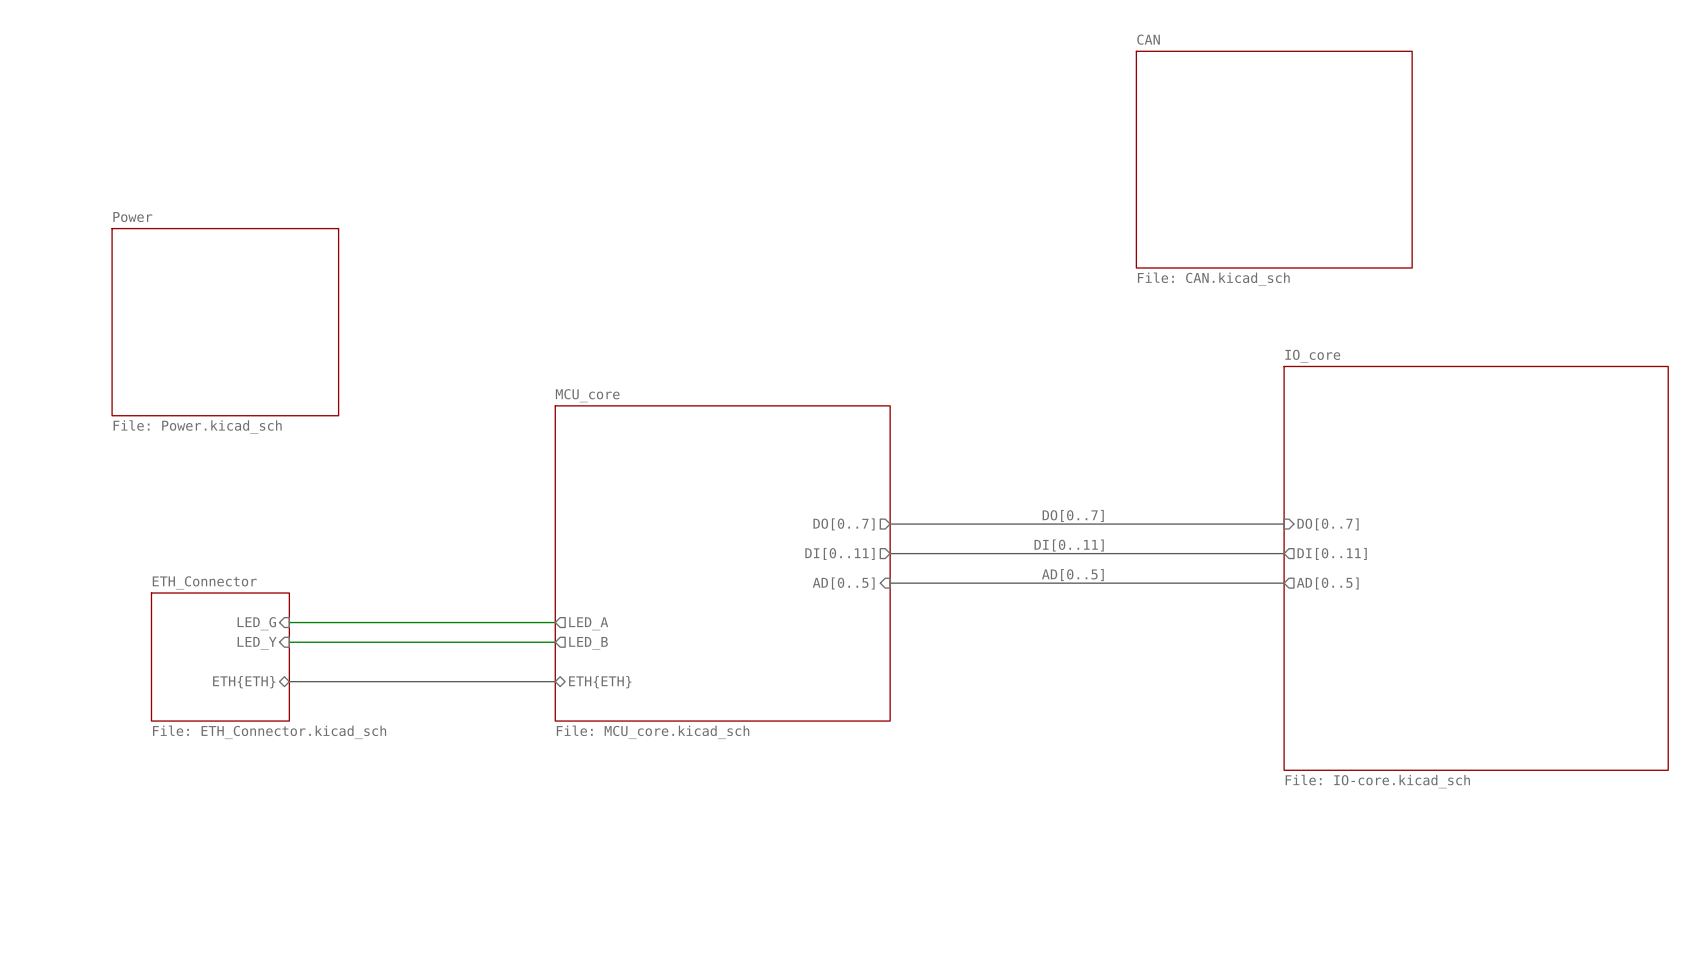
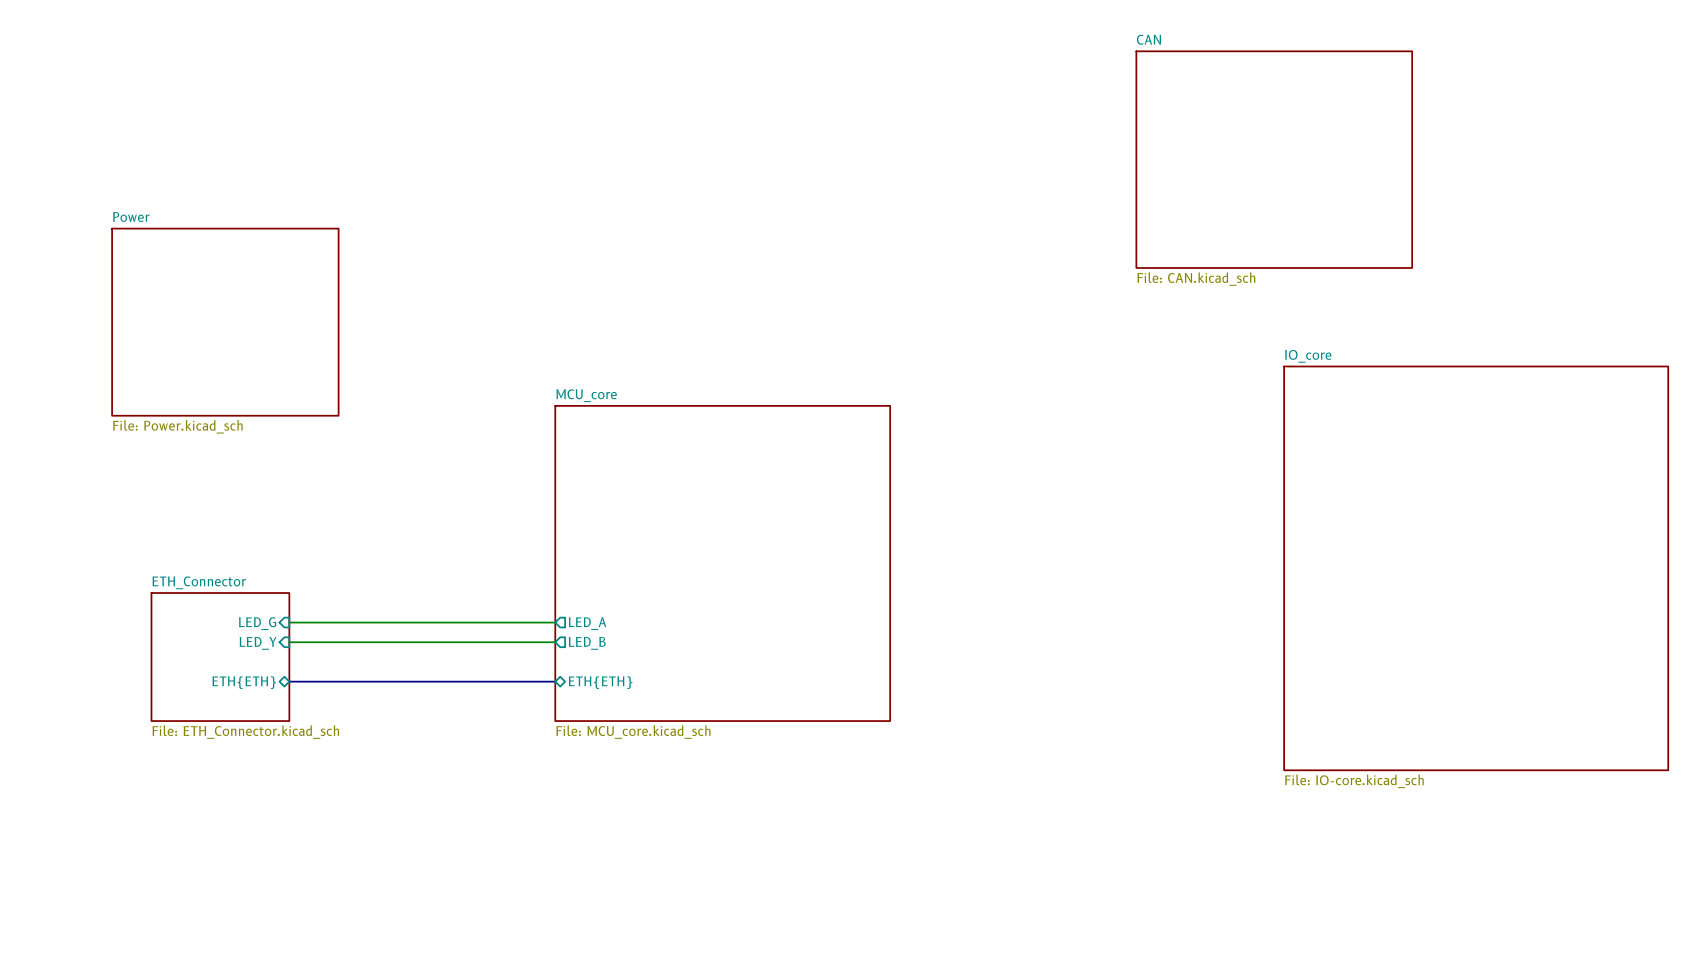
label: DO[0..7] (1073, 515) -> none
sheet pin: DO[0..7] (844, 524) -> none
bus: (890, 524) (1284, 524) -> none
sheet pin: DO[0..7] (1328, 524) -> none
label: DI[0..11] (1069, 545) -> none
sheet pin: DI[0..11] (839, 553) -> none
bus: (890, 553) (1284, 553) -> none
sheet pin: DI[0..11] (1332, 553) -> none
label: AD[0..5] (1072, 575) -> none
sheet pin: AD[0..5] (843, 583) -> none
bus: (890, 583) (1284, 583) -> none
sheet pin: AD[0..5] (1327, 583) -> none

